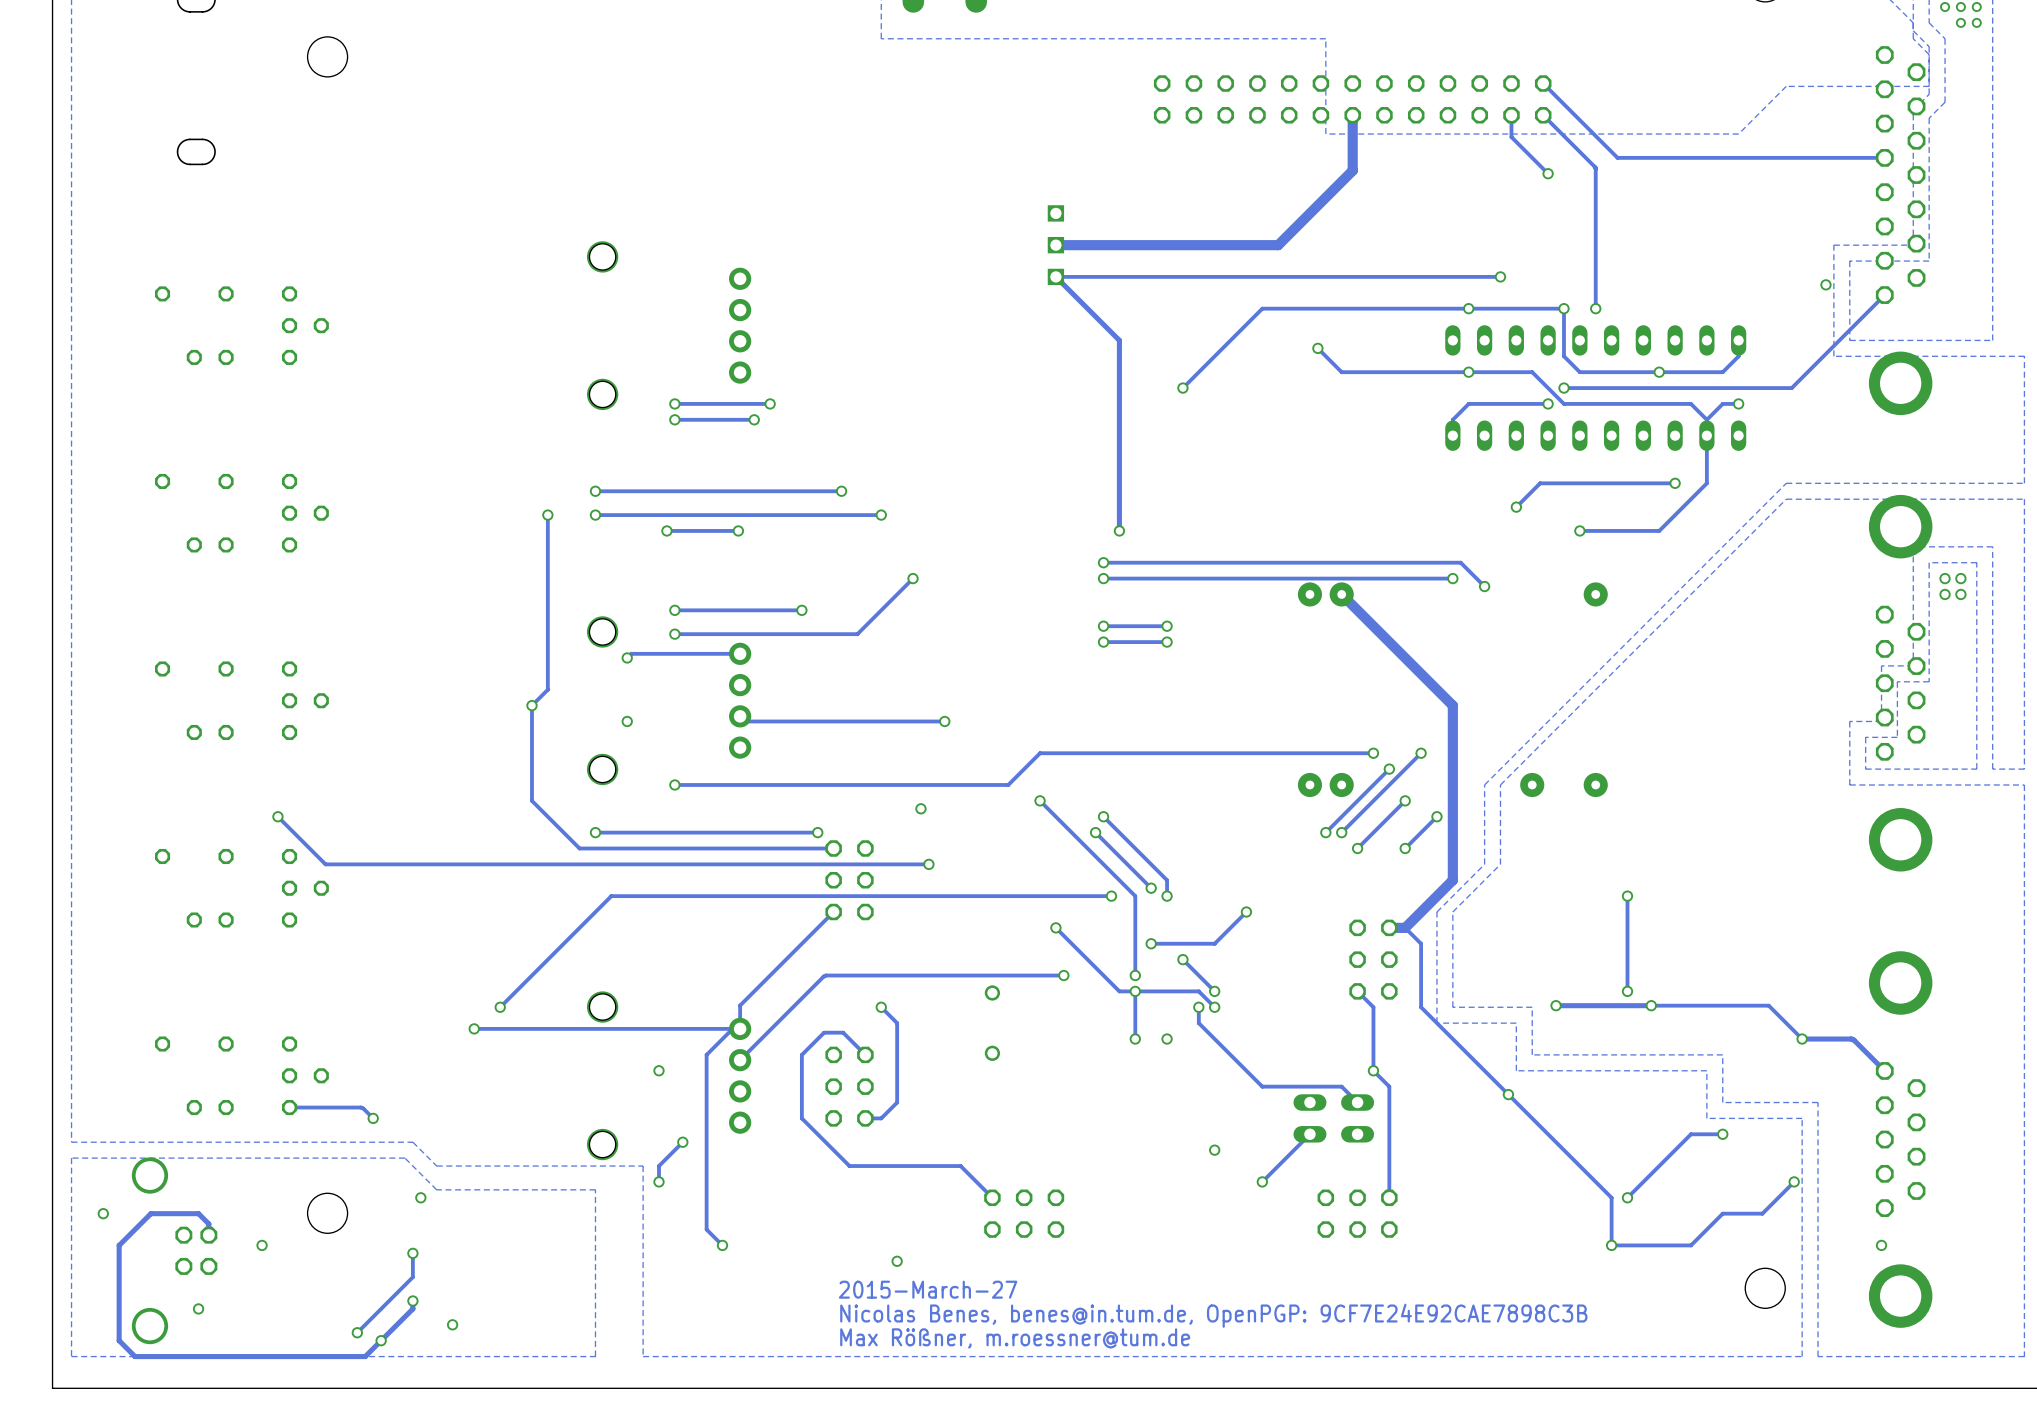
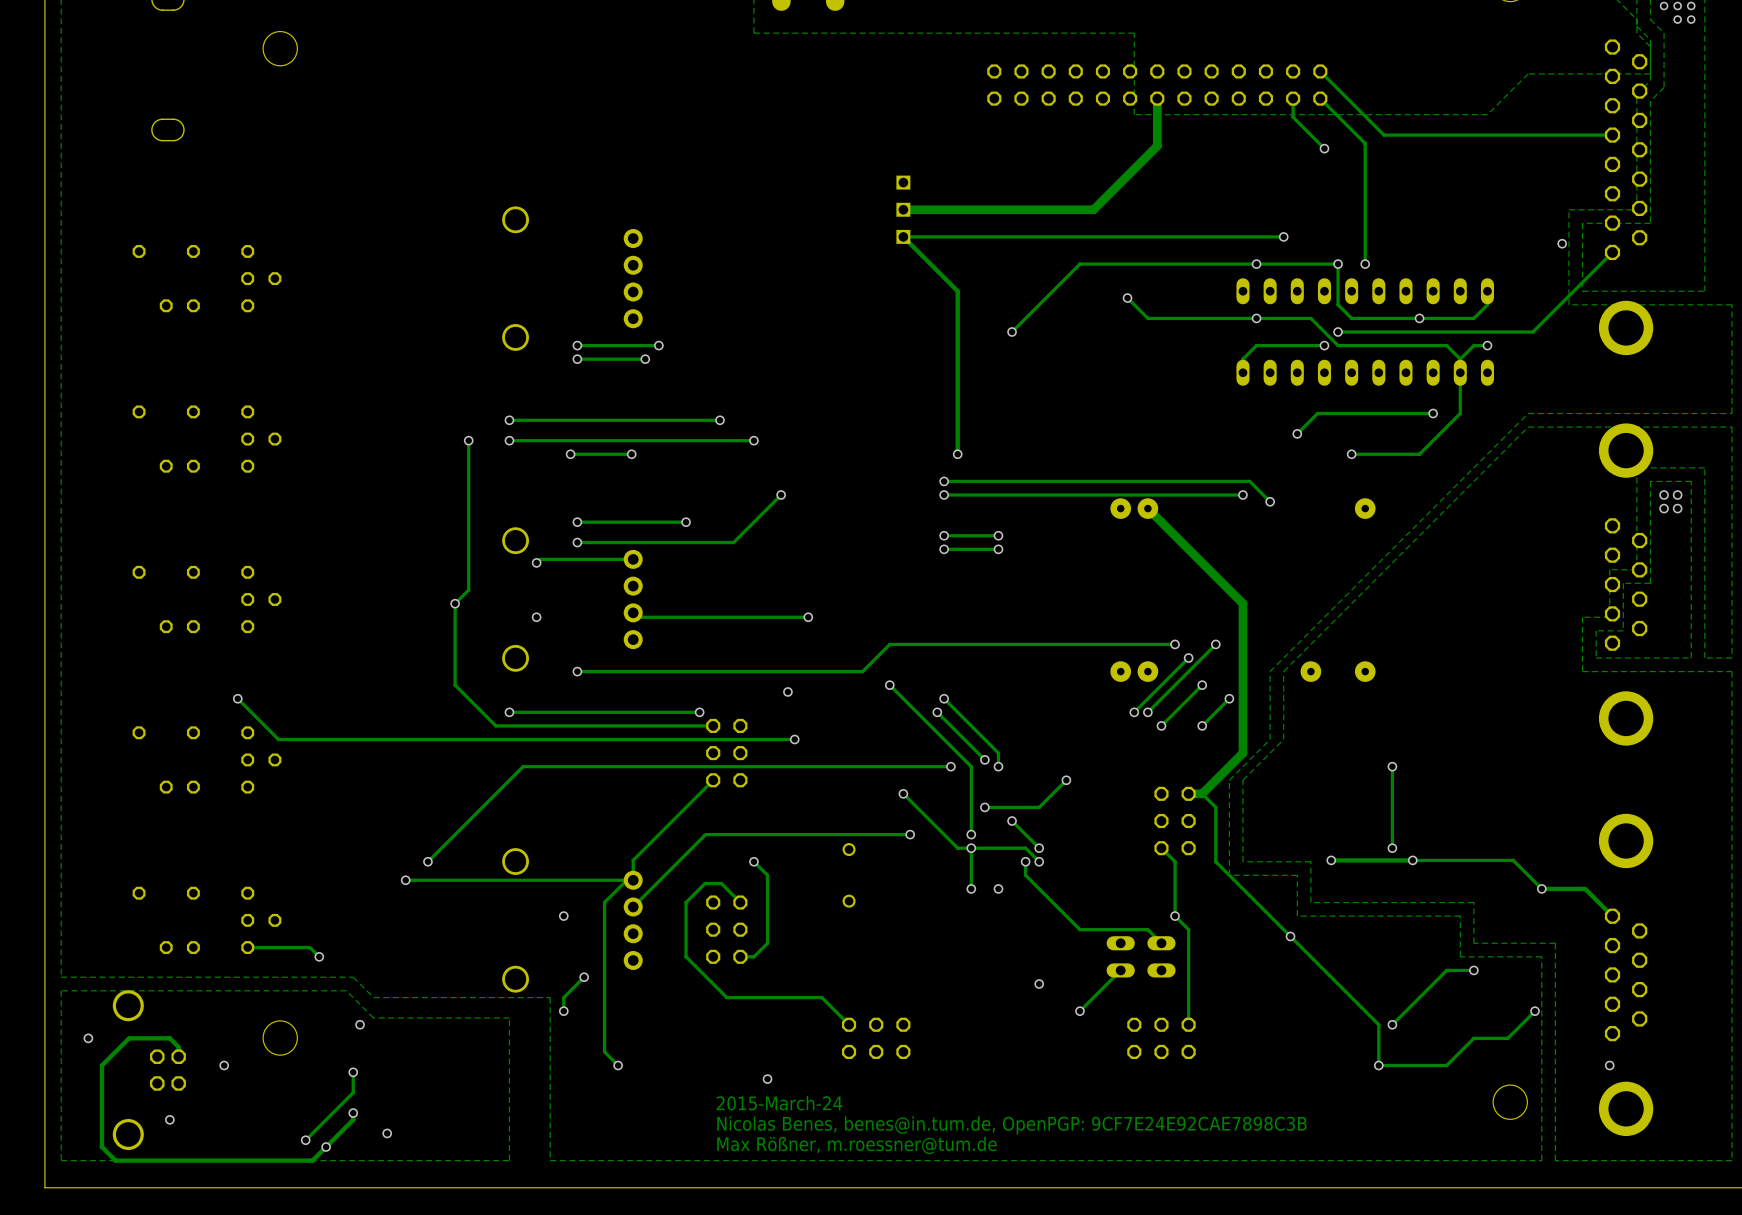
text: 2015-March-27 (928, 1289) -> 2015-March-24 (779, 1103)

